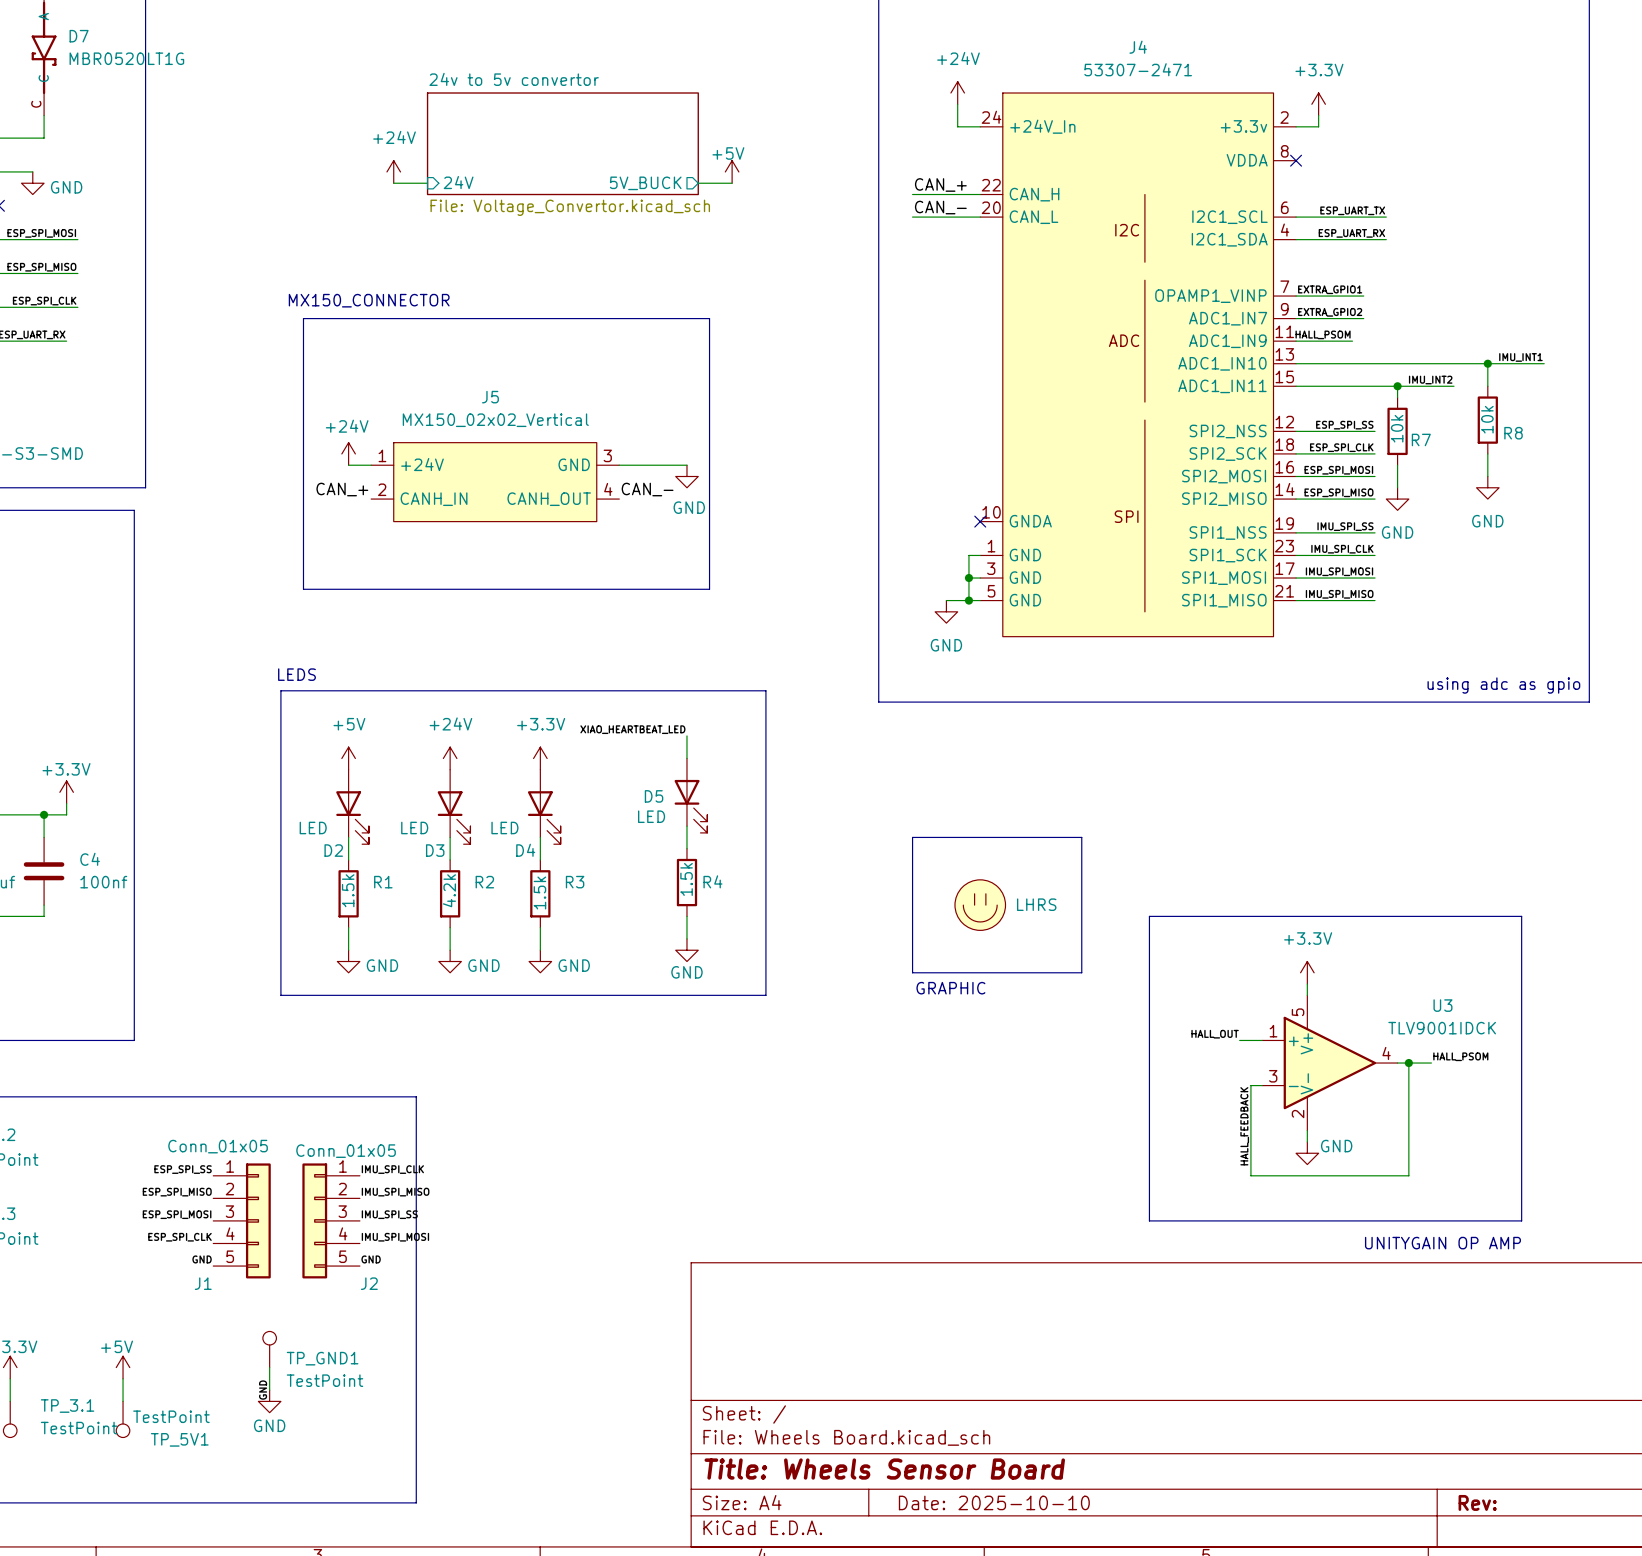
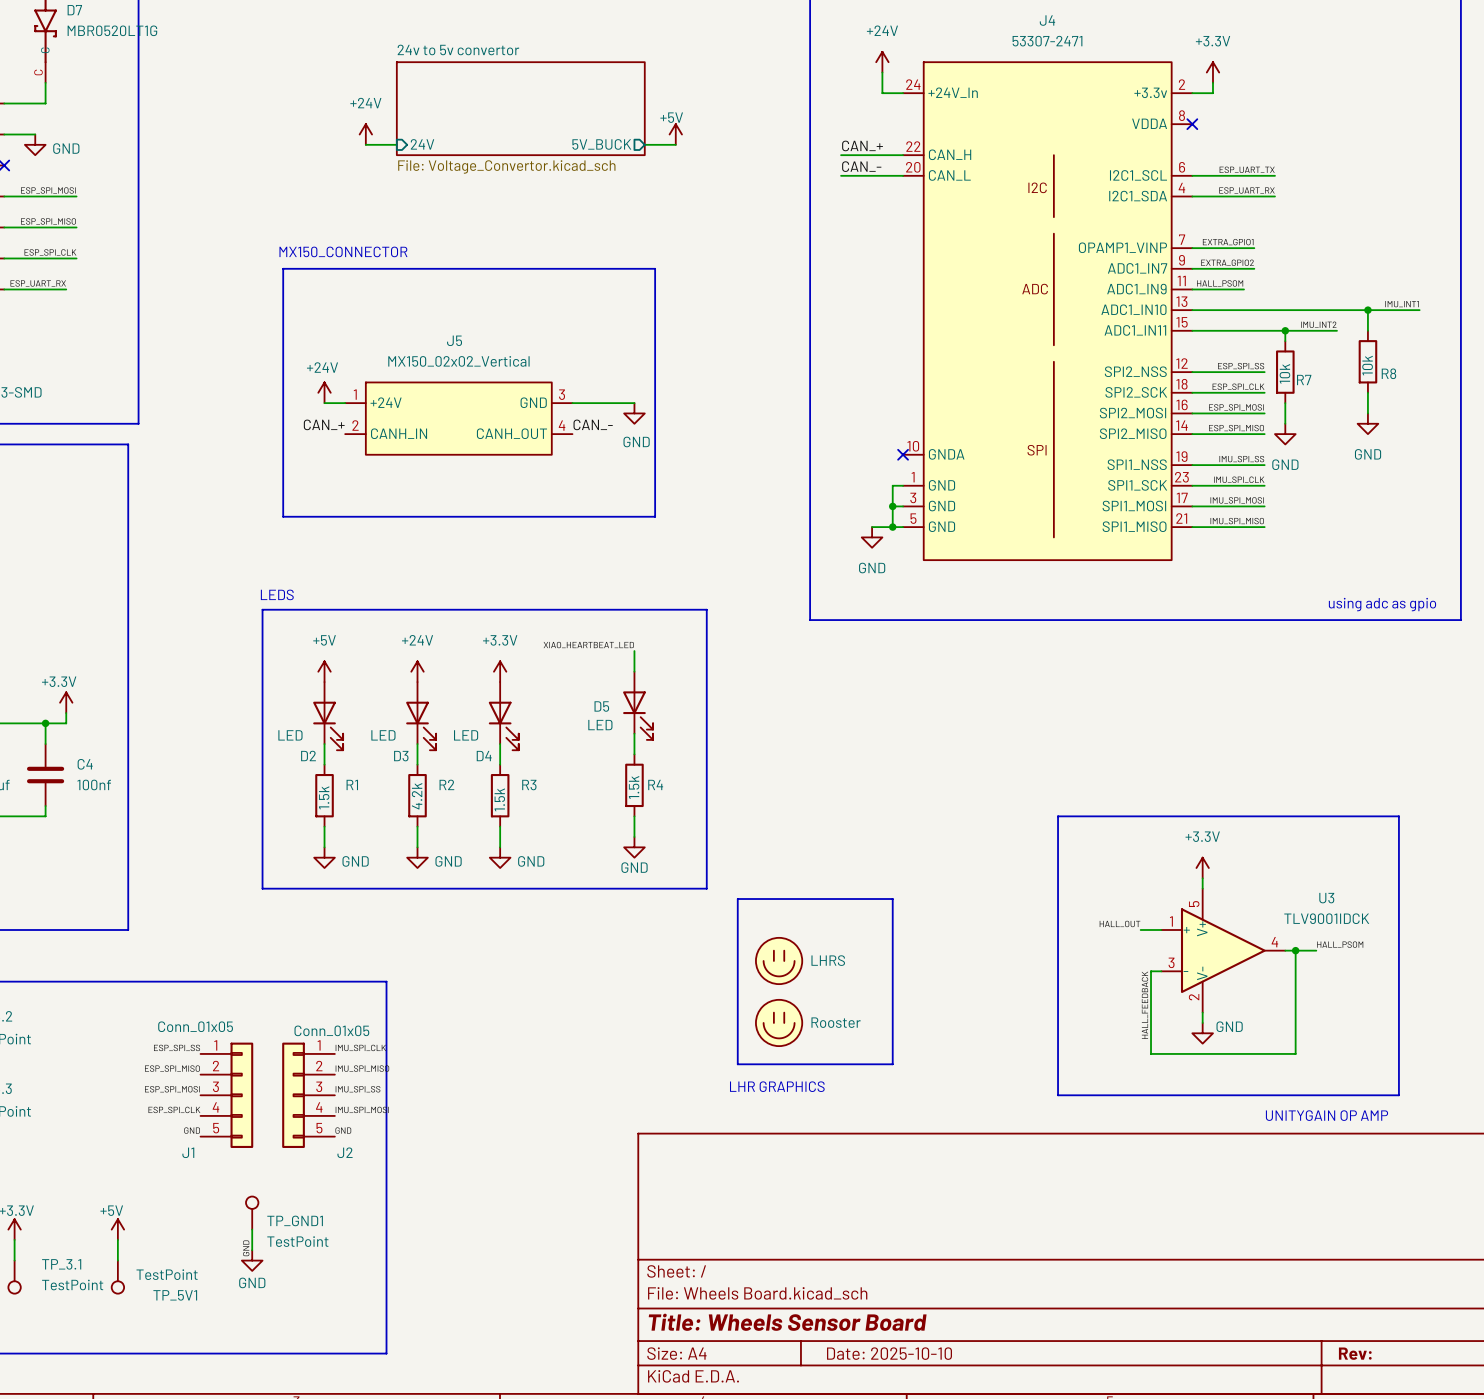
line: (912, 837) (1081, 837) (1081, 972) (912, 972) (912, 837) -> none
part position: (980, 905) -> (779, 960)
text: GRAPHIC (950, 988) -> none
line: none -> (737, 899) (892, 899) (892, 1064) (737, 1064) (737, 899)
part: none -> Rooster (779, 1022)
text: none -> LHR GRAPHICS (777, 1086)

